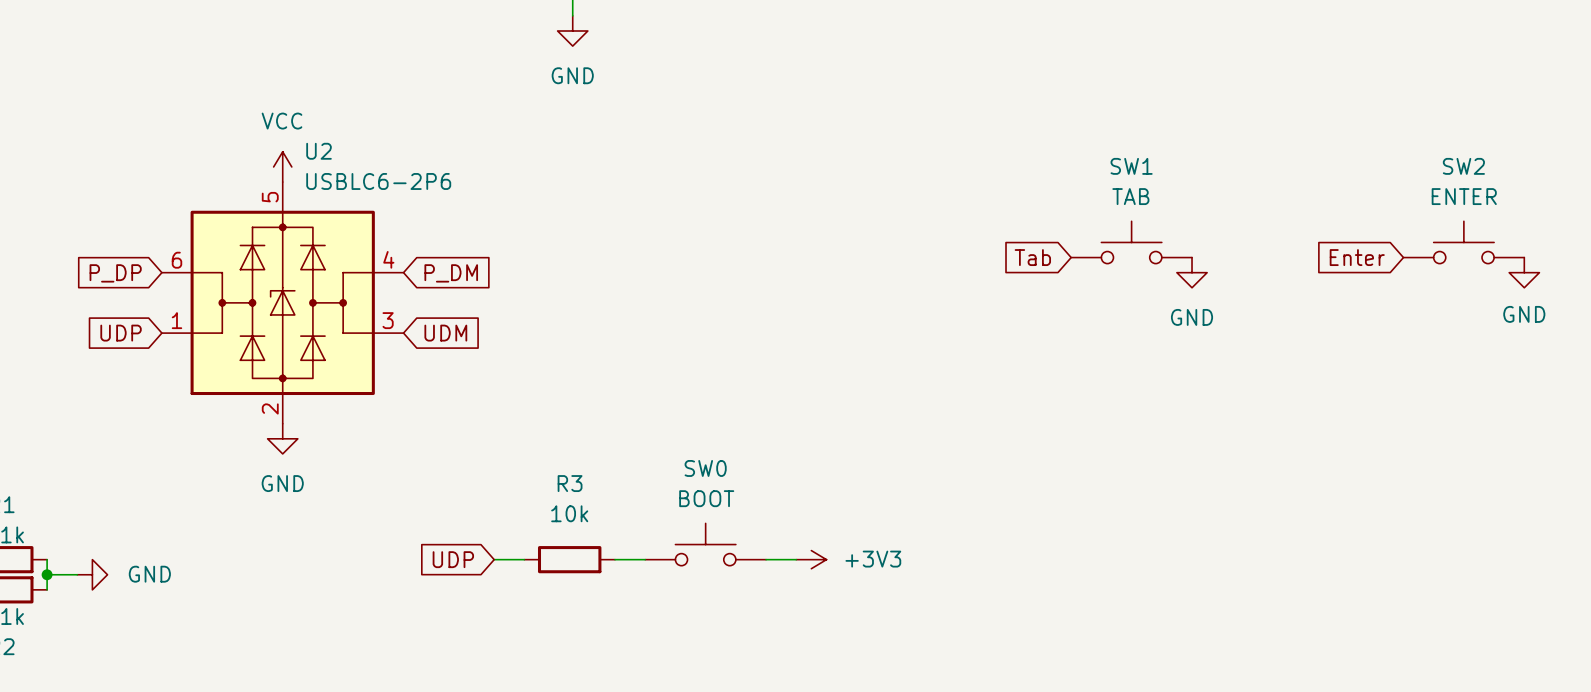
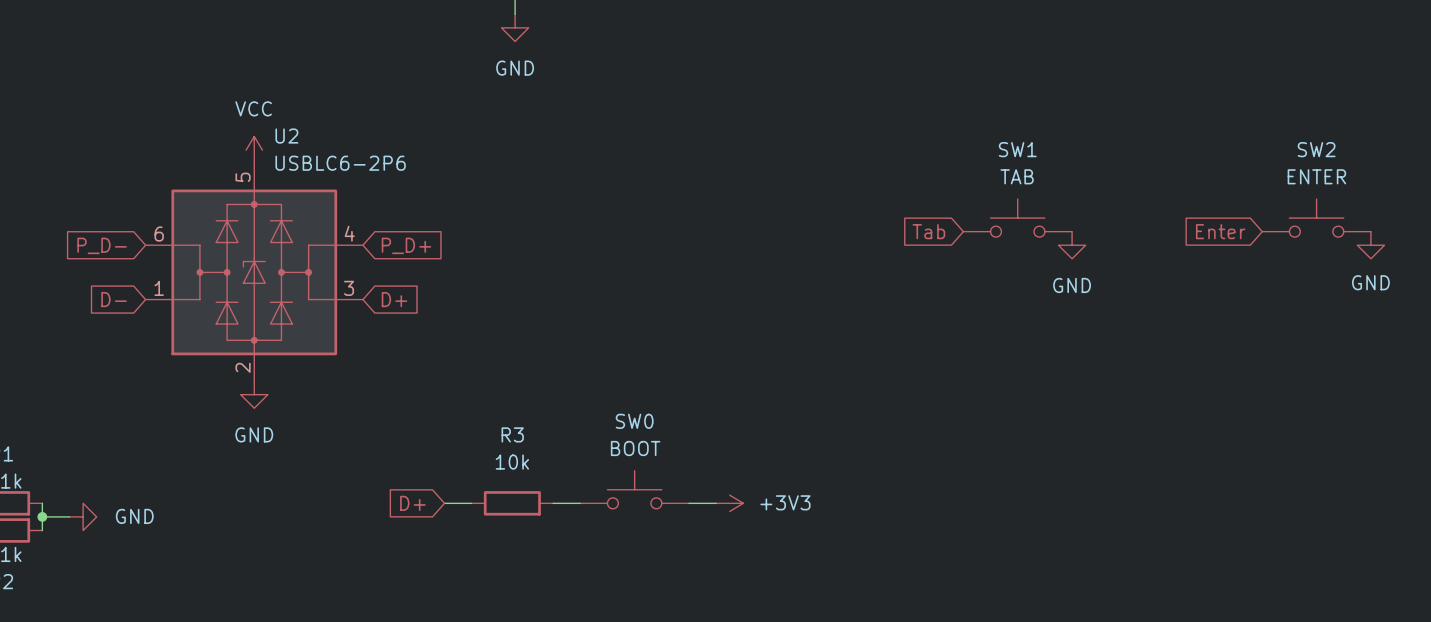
global label: P_DP (115, 273) -> P_D- (102, 245)
global label: P_DM (451, 273) -> P_D+ (406, 245)
global label: UDP (121, 333) -> D- (114, 299)
global label: UDM (445, 333) -> D+ (394, 299)
global label: UDP (453, 559) -> D+ (412, 503)

